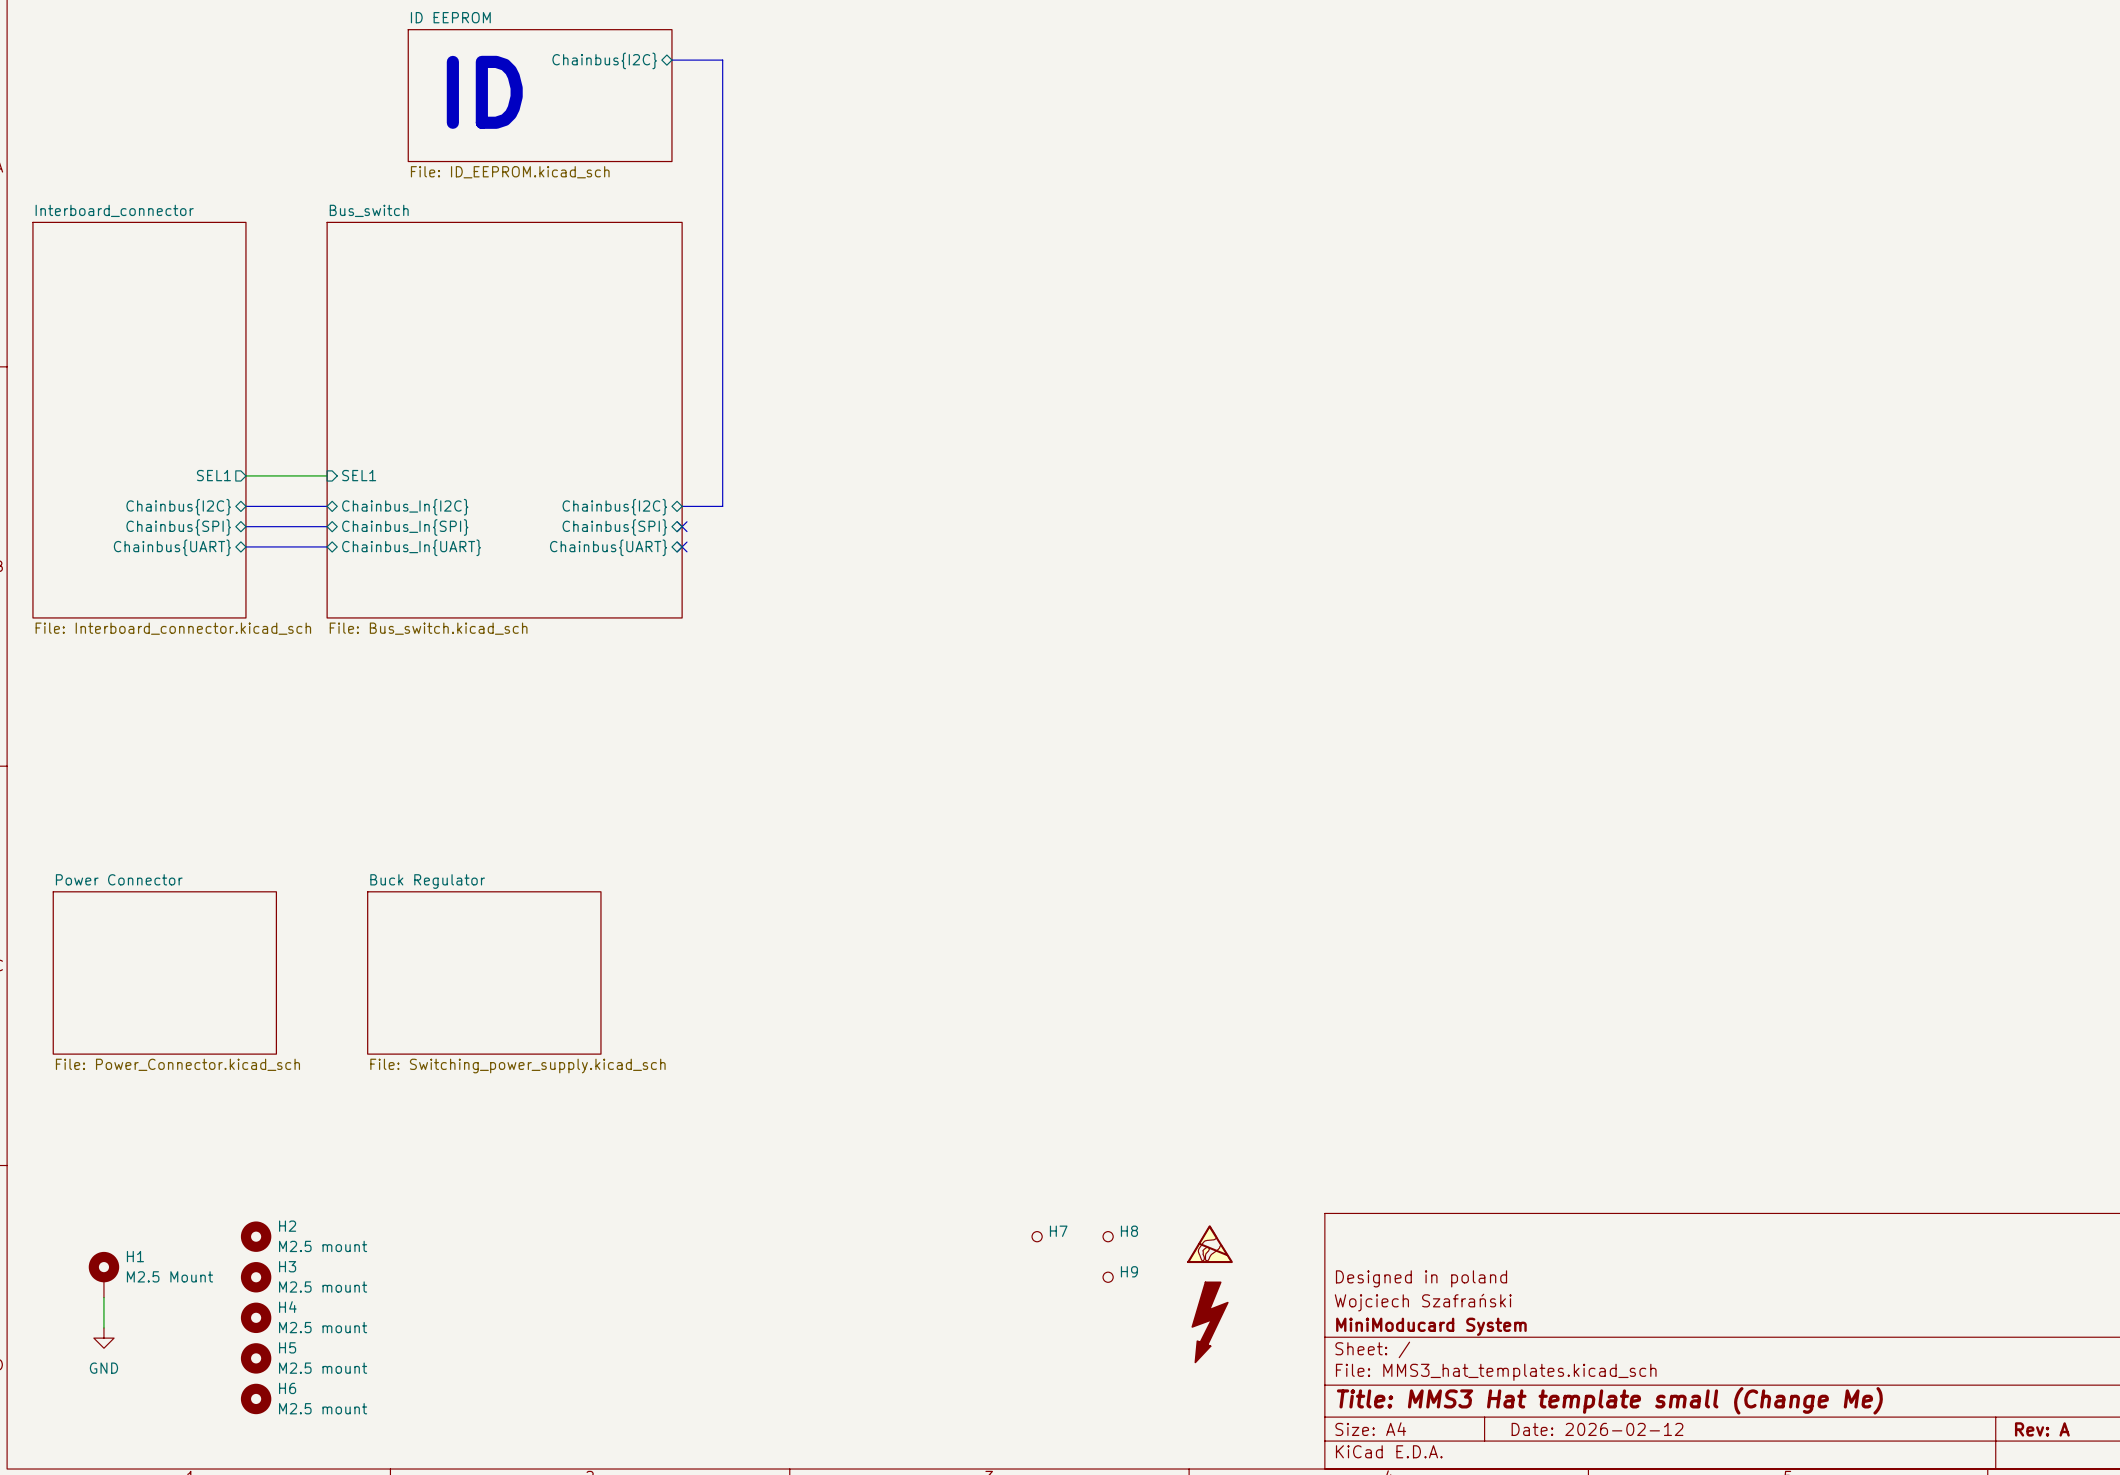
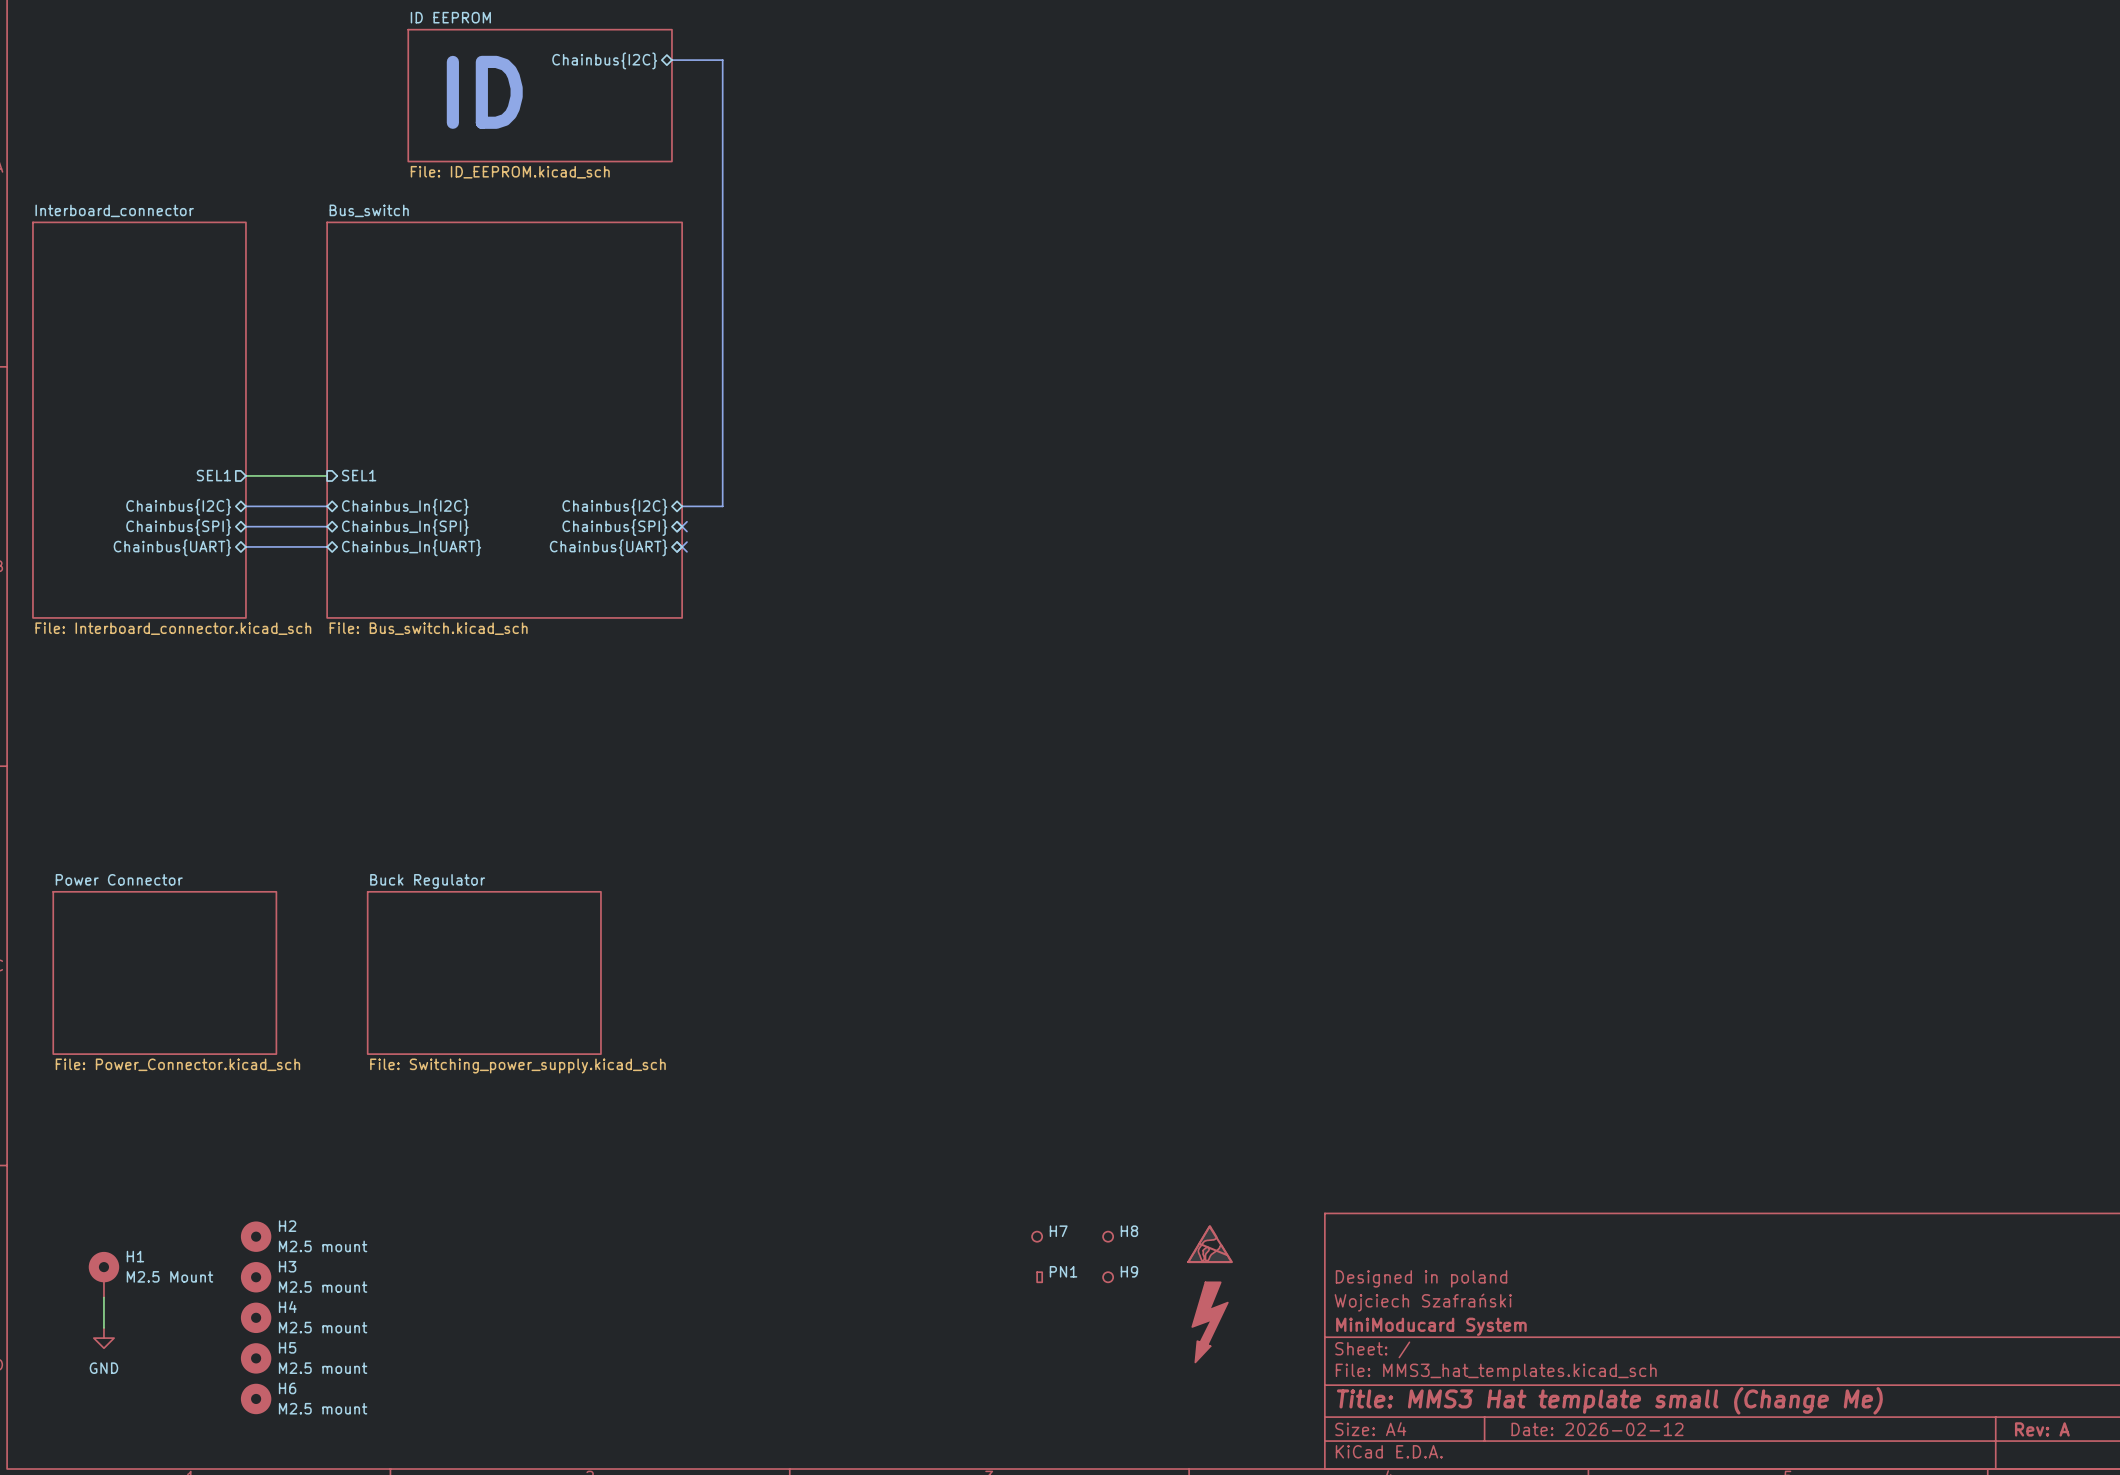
PN1: none -> (1039, 1277)

